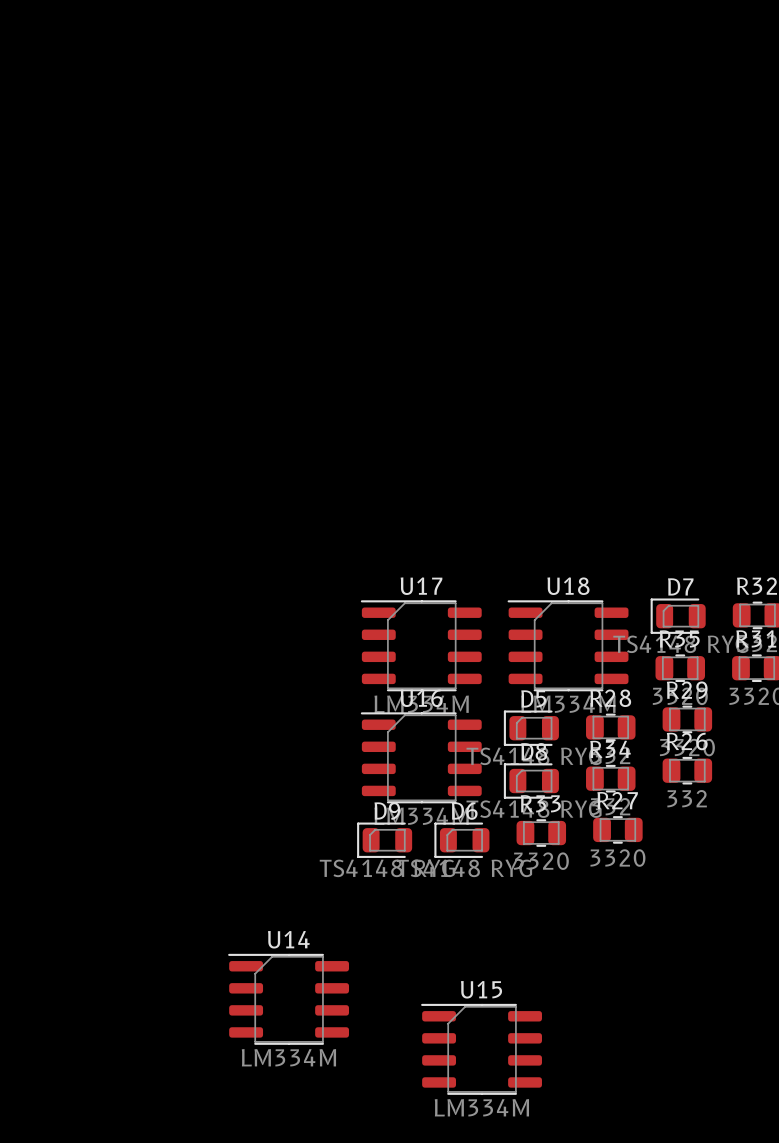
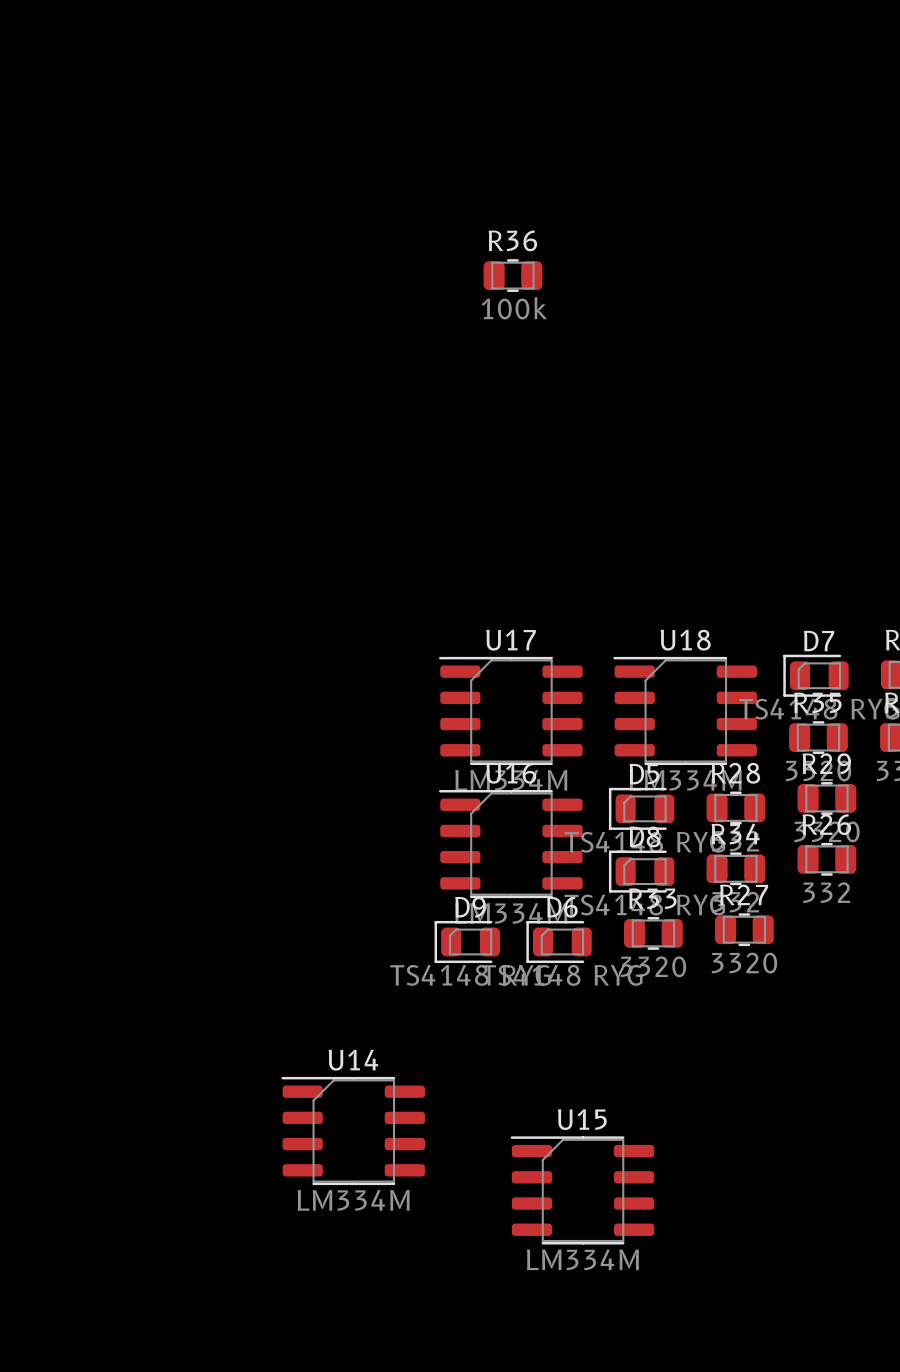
R36: none -> 100k (512, 275)

